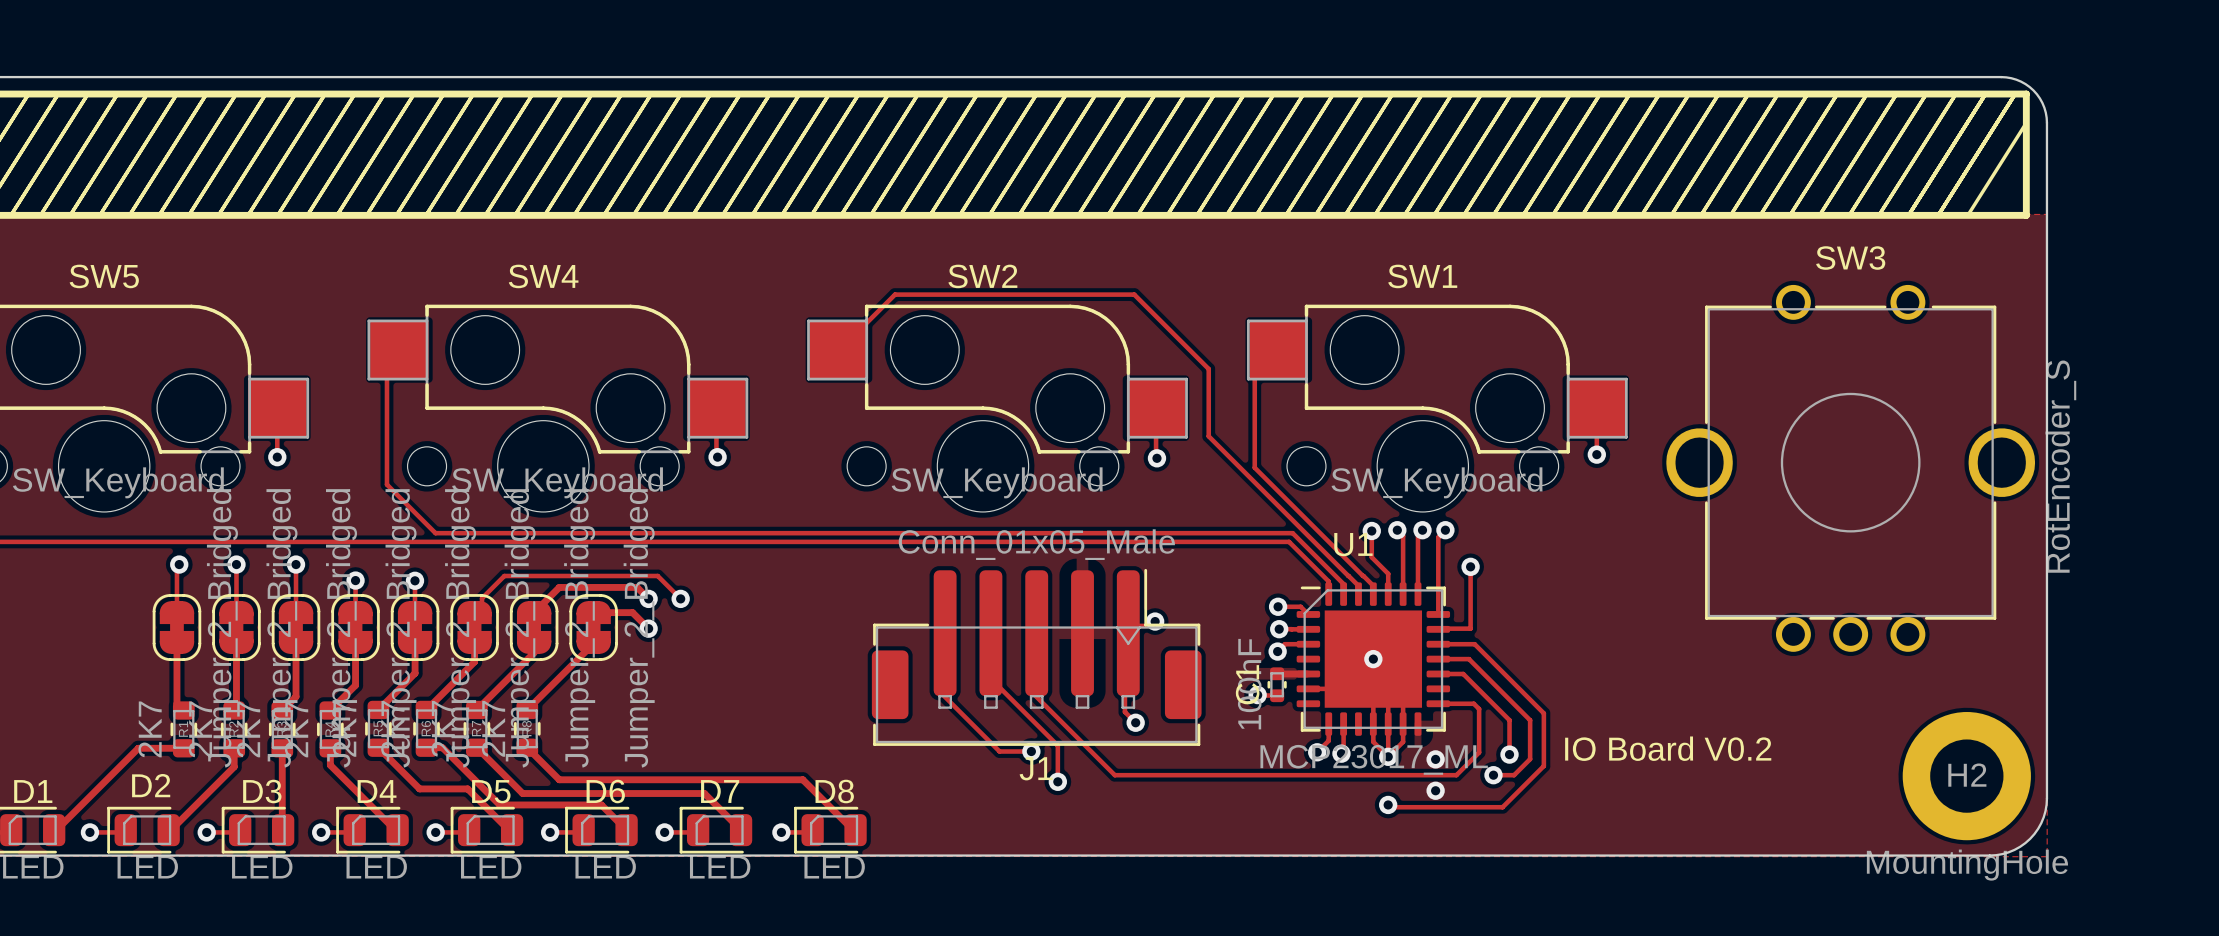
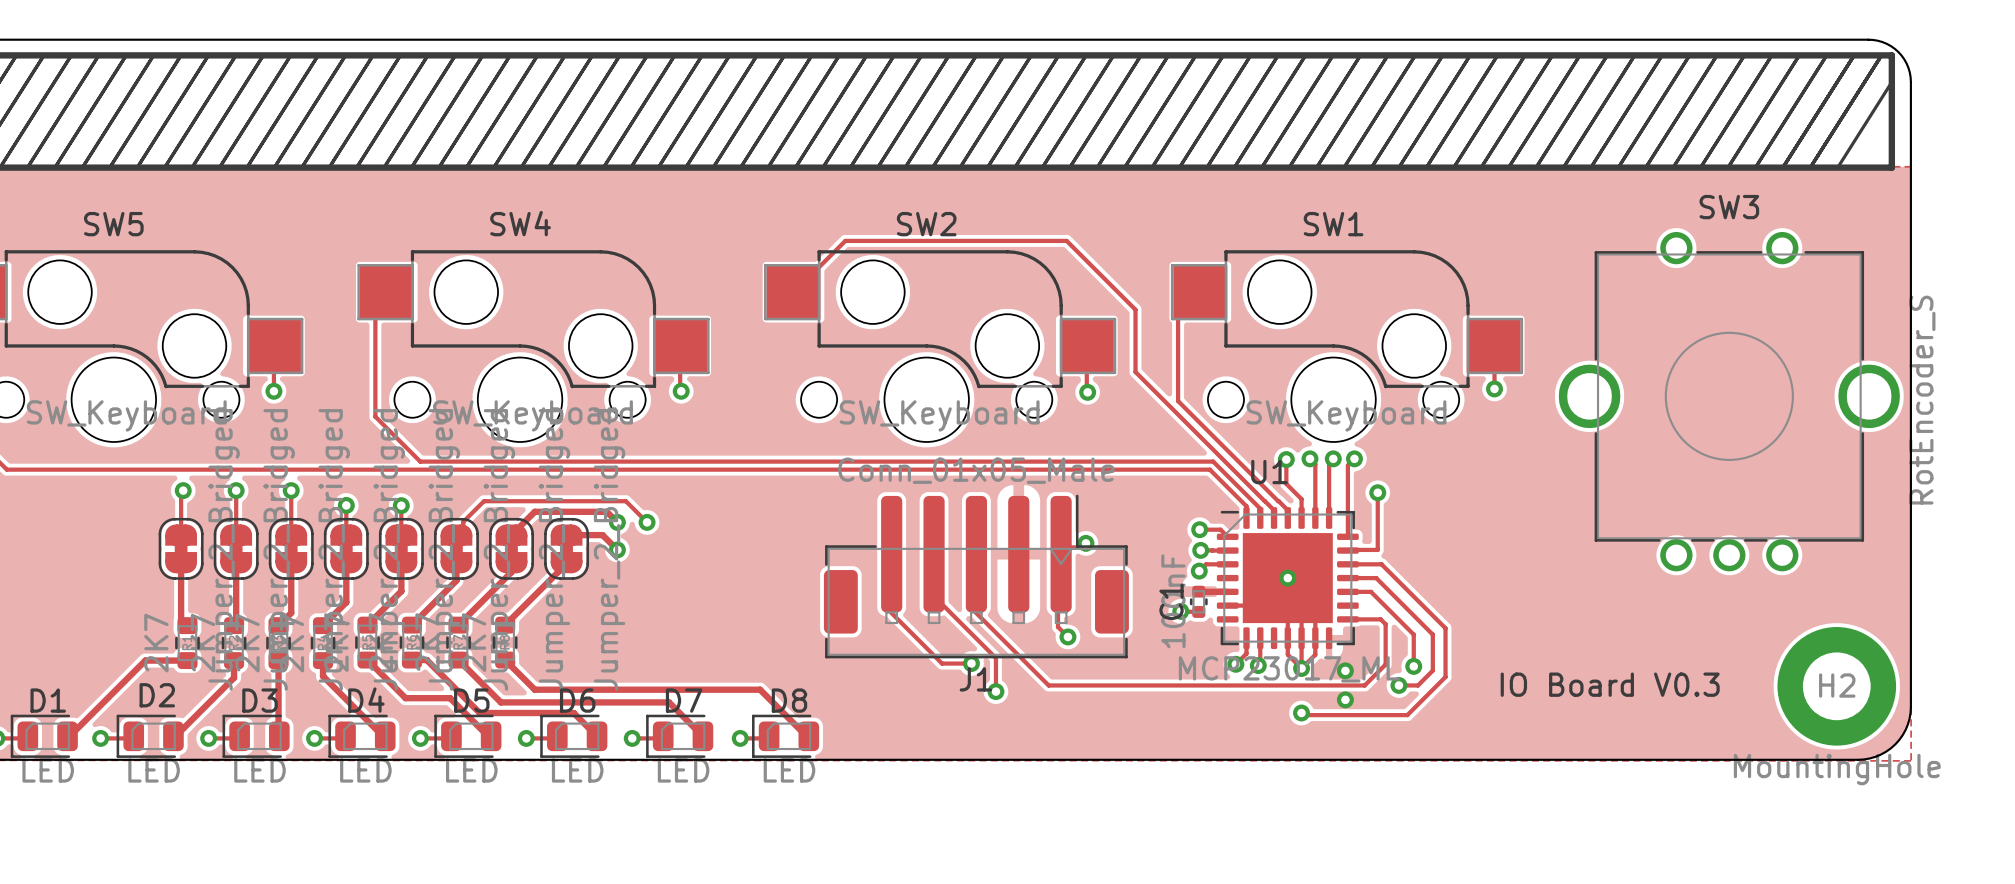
text: IO Board V0.2 (1668, 748) -> IO Board V0.3 (1610, 684)

